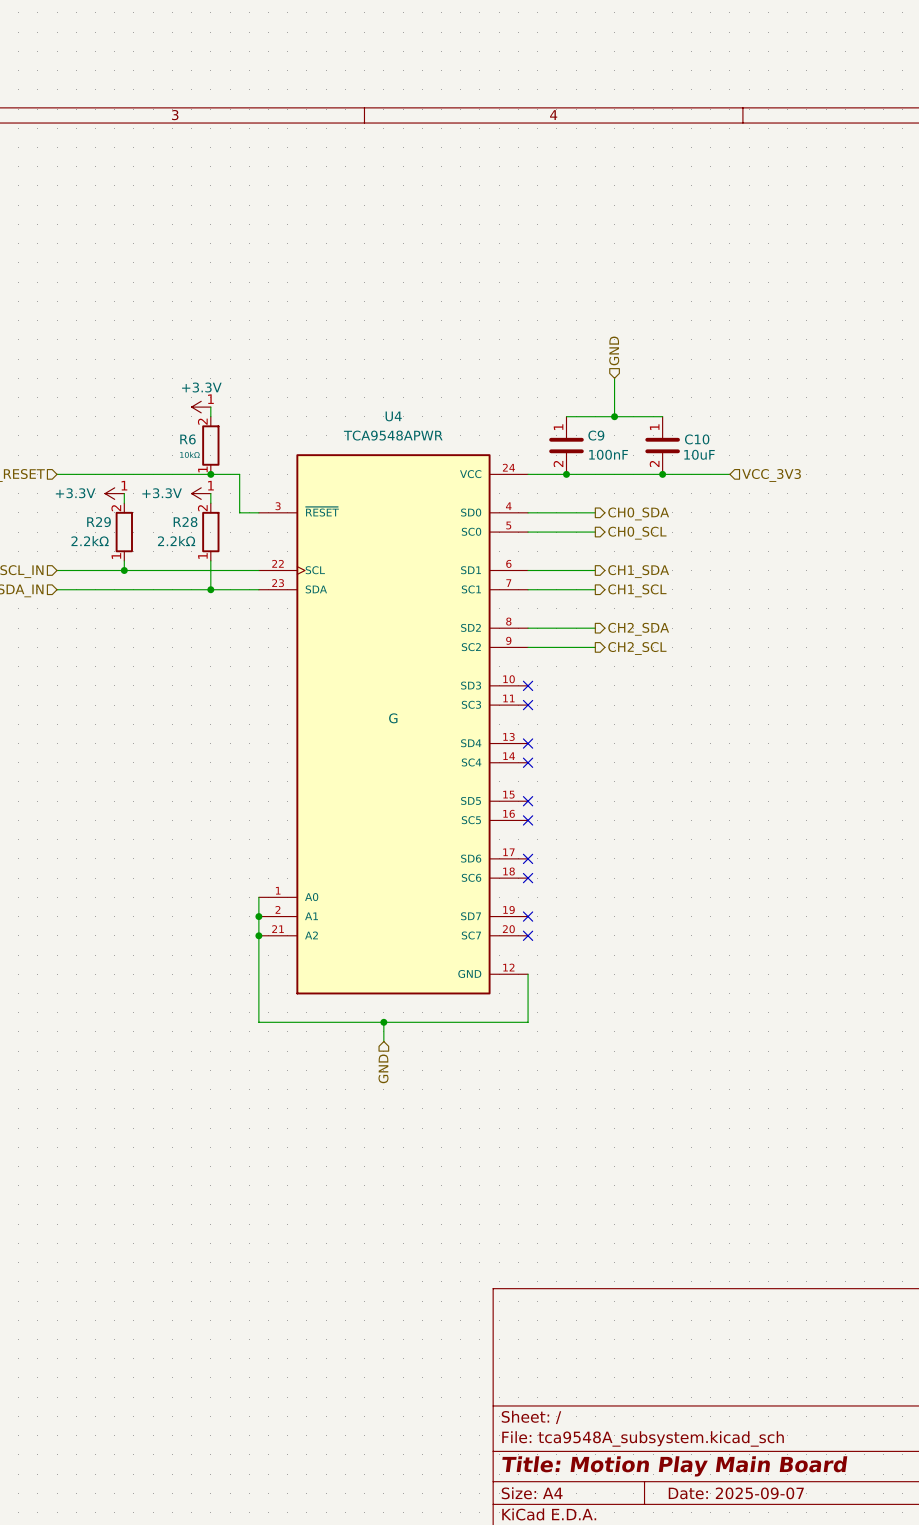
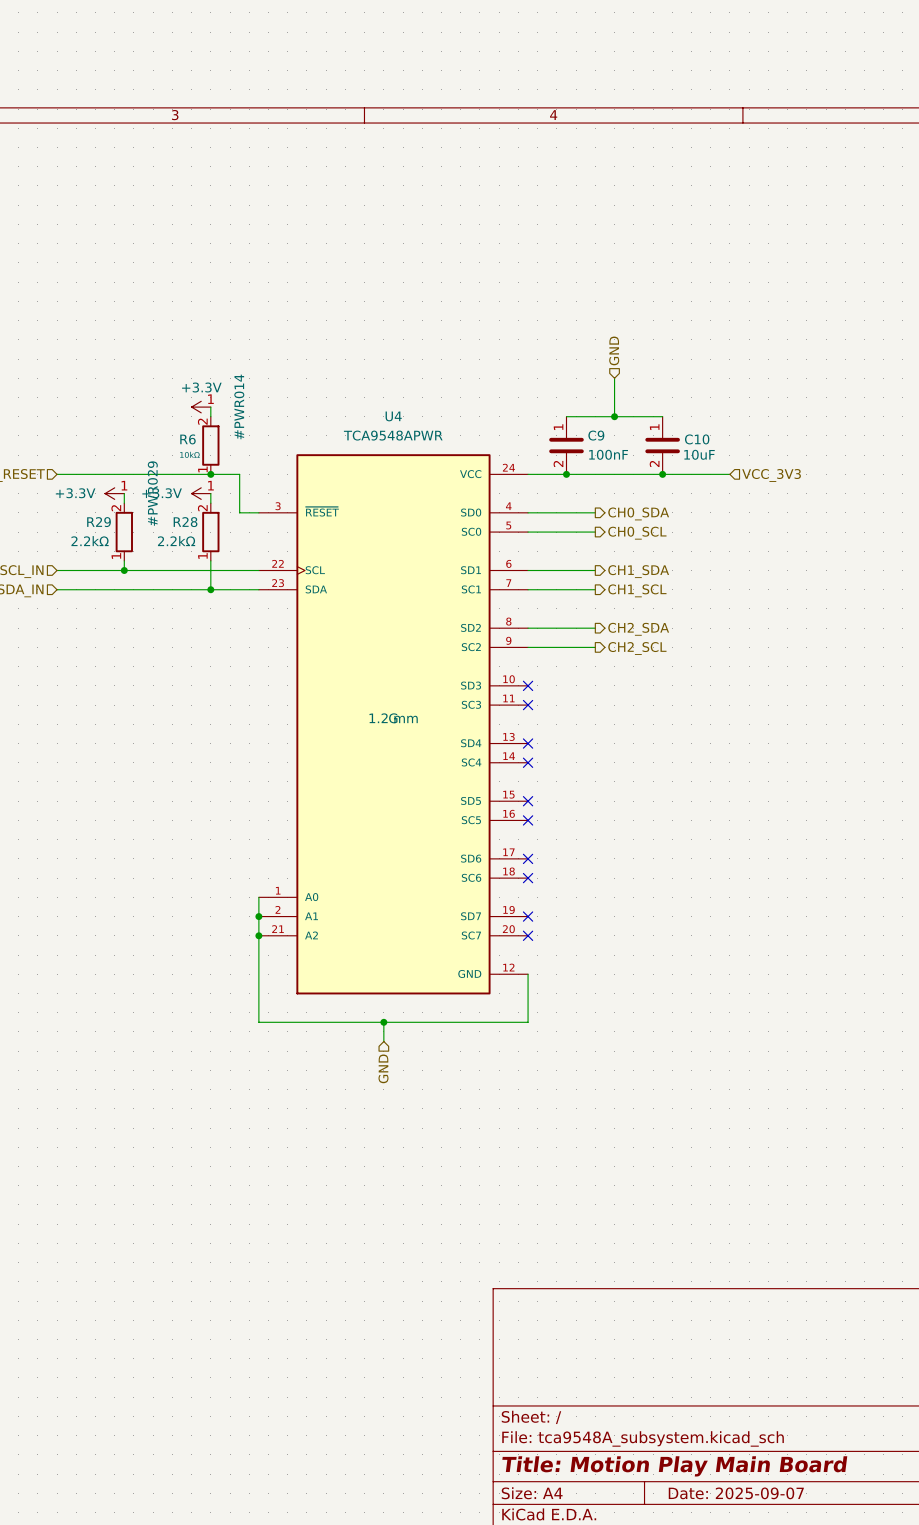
#PWR014 name: none -> #PWR014 (239, 406)
#PWR029 name: none -> #PWR029 (152, 493)
U4 text: none -> 1.2 mm (393, 718)

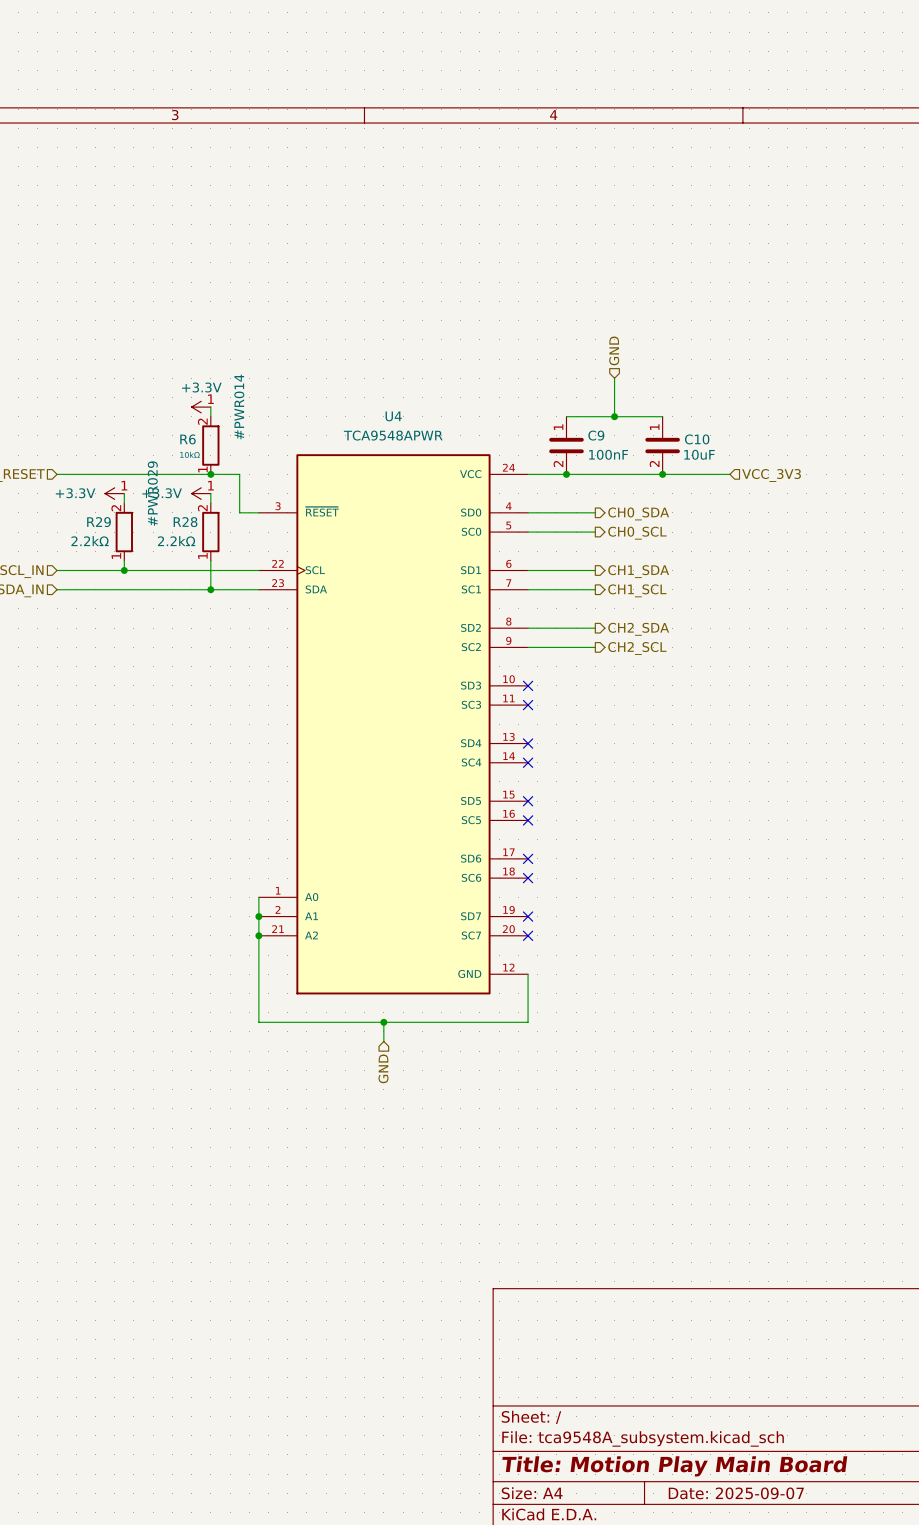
U4 text: 1.2 mm (393, 718) -> none
U4 text: G (393, 718) -> none

